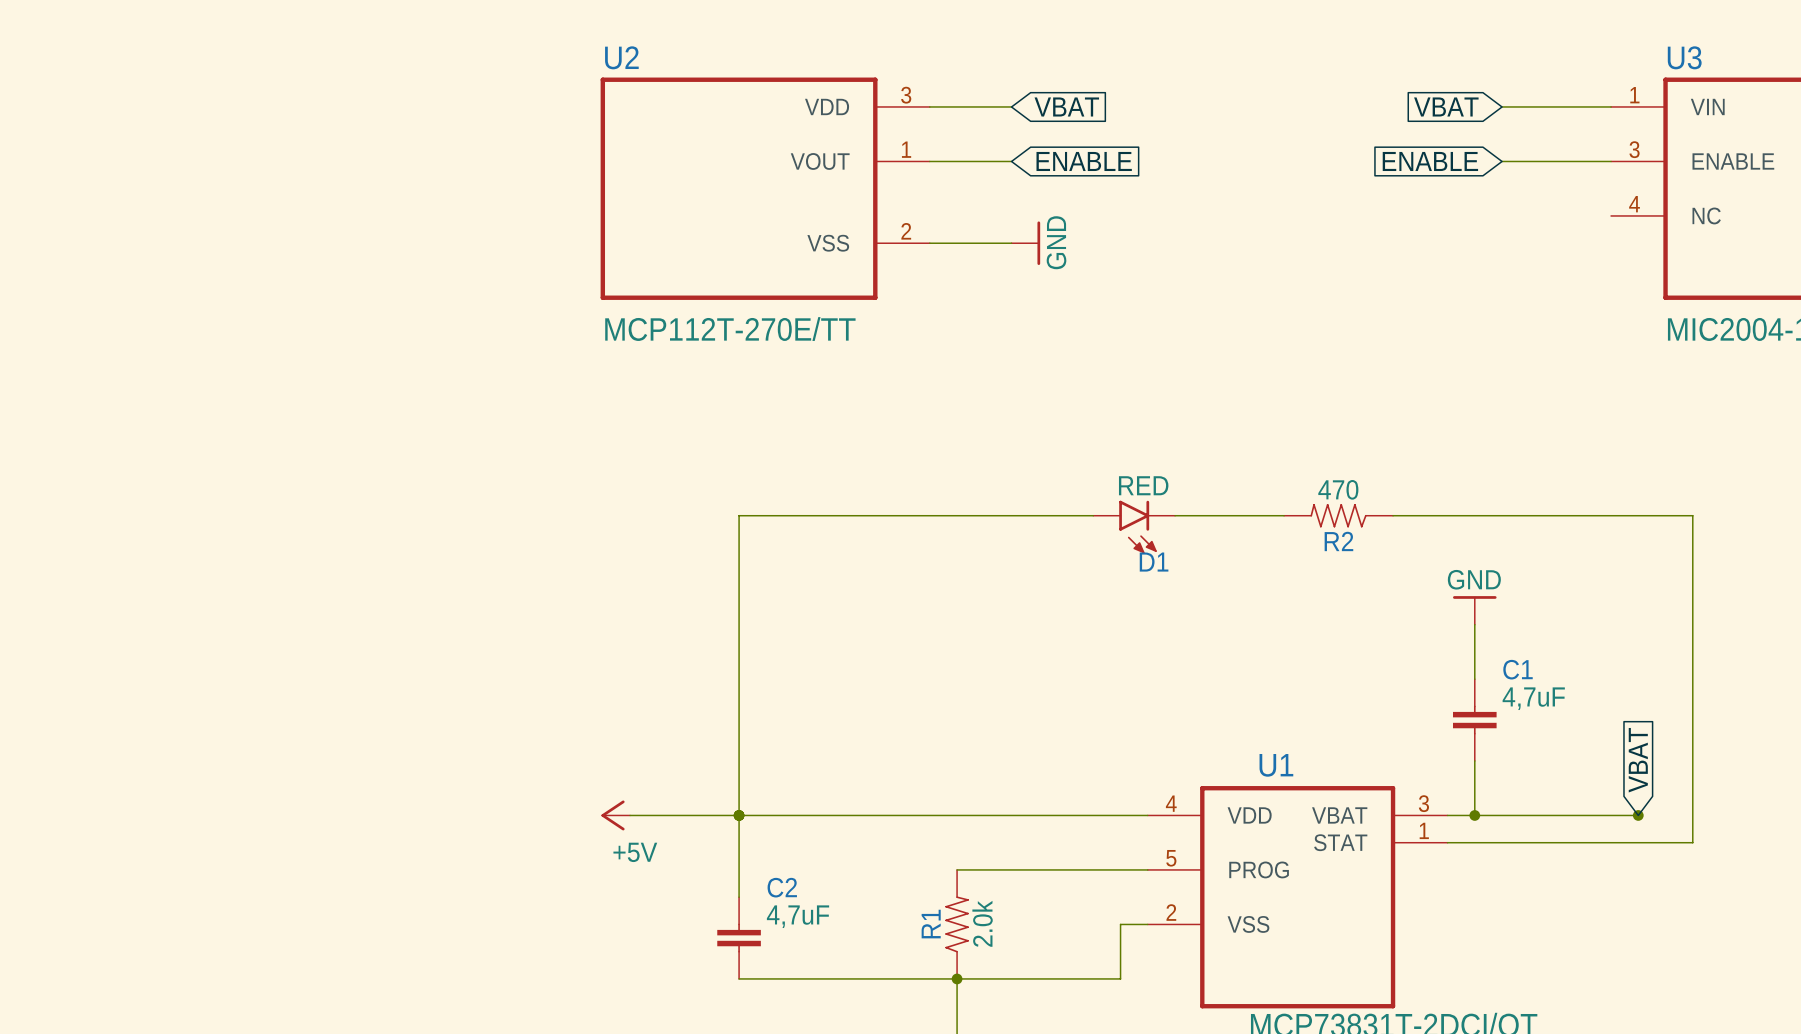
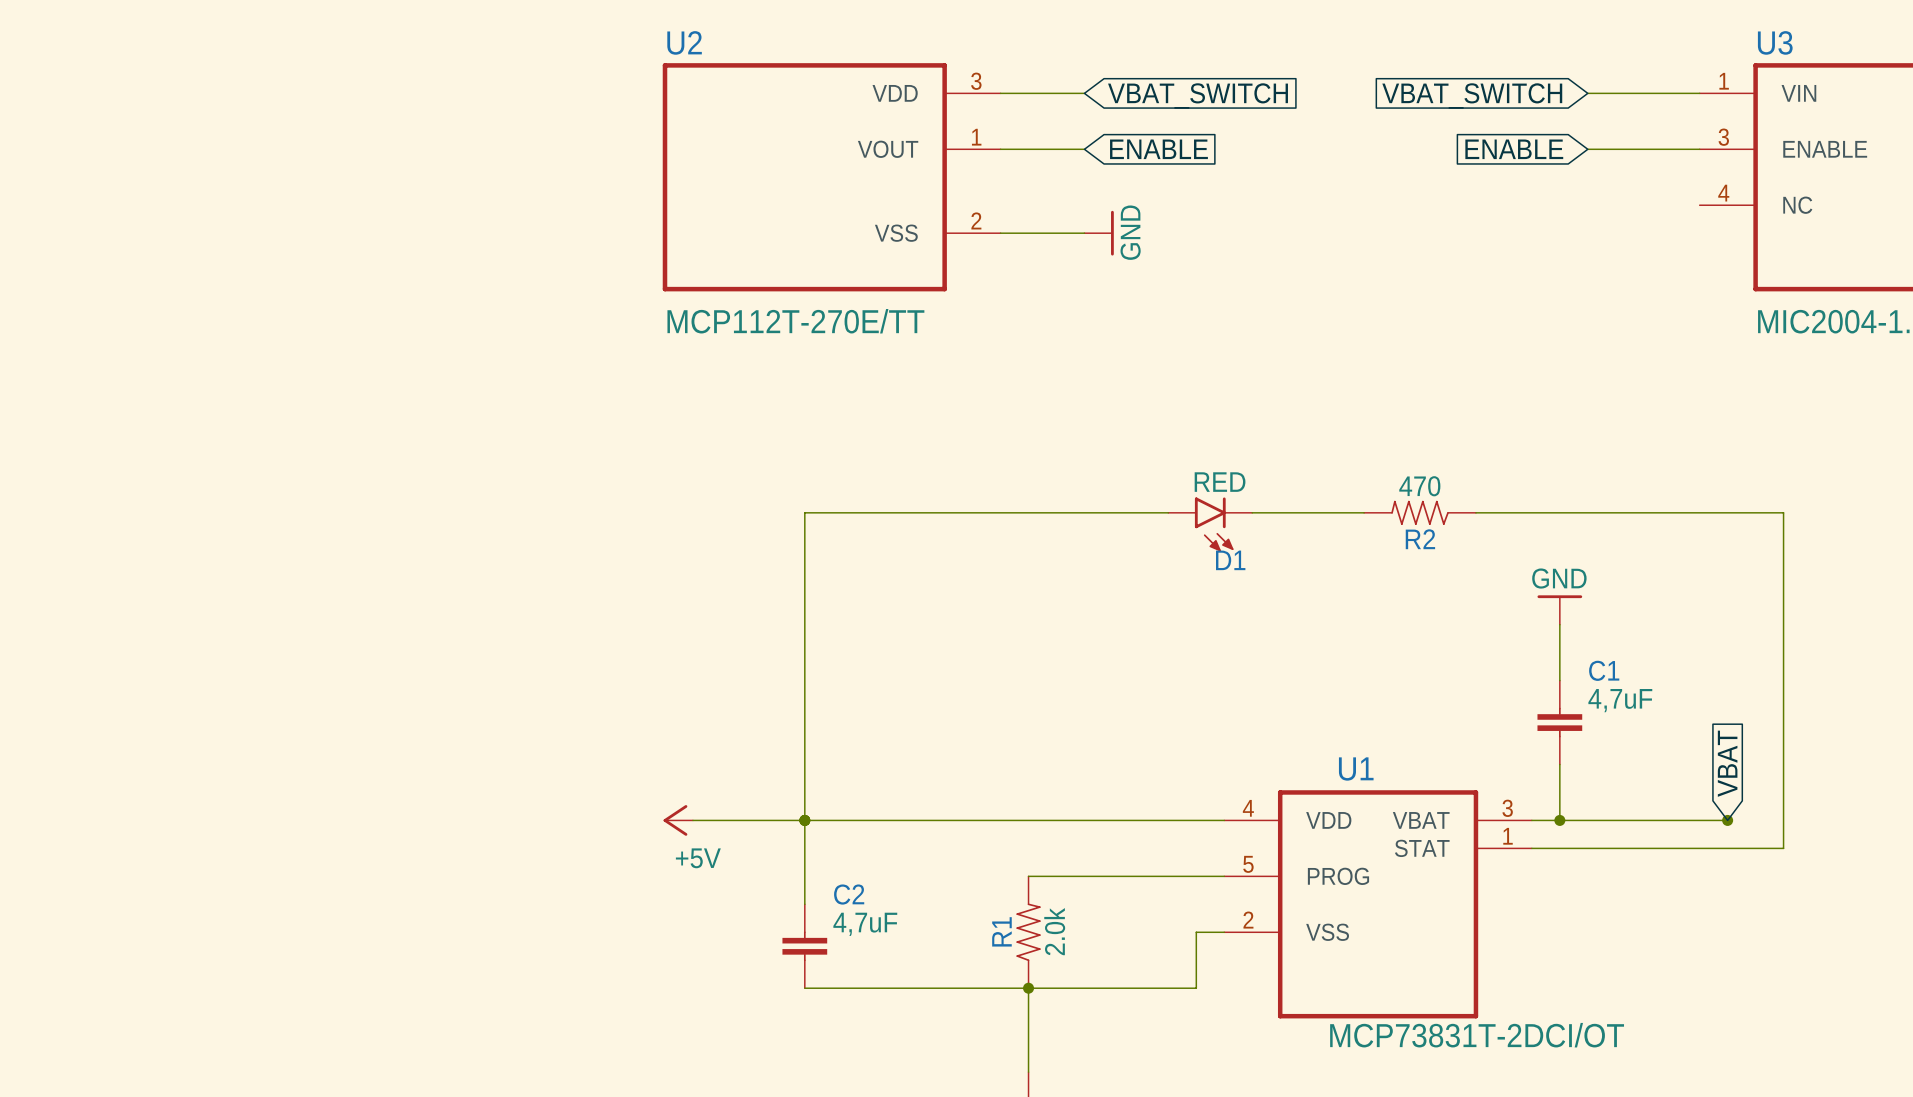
global label: VBAT (1066, 106) -> VBAT_SWITCH (1198, 96)
global label: VBAT (1446, 106) -> VBAT_SWITCH (1472, 96)

